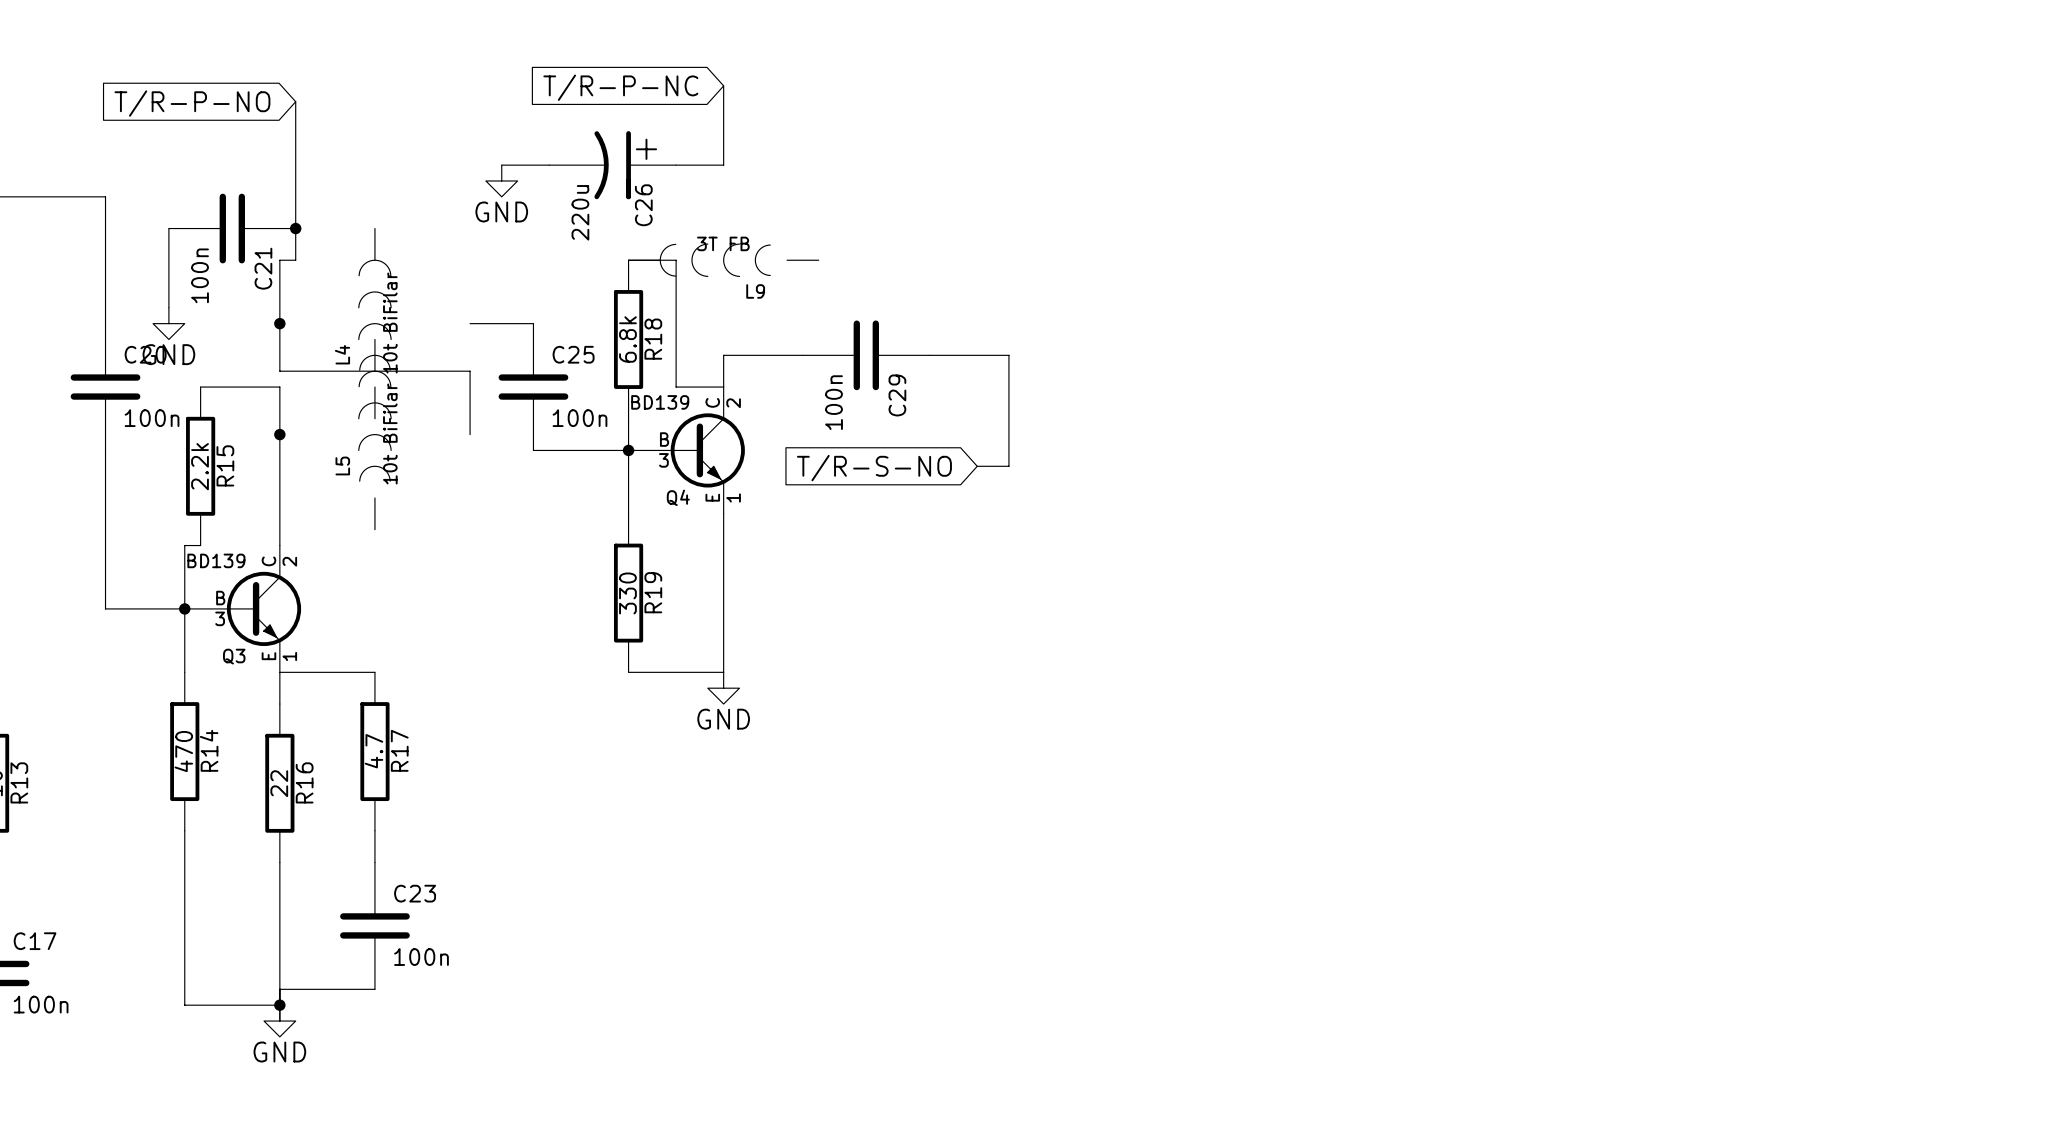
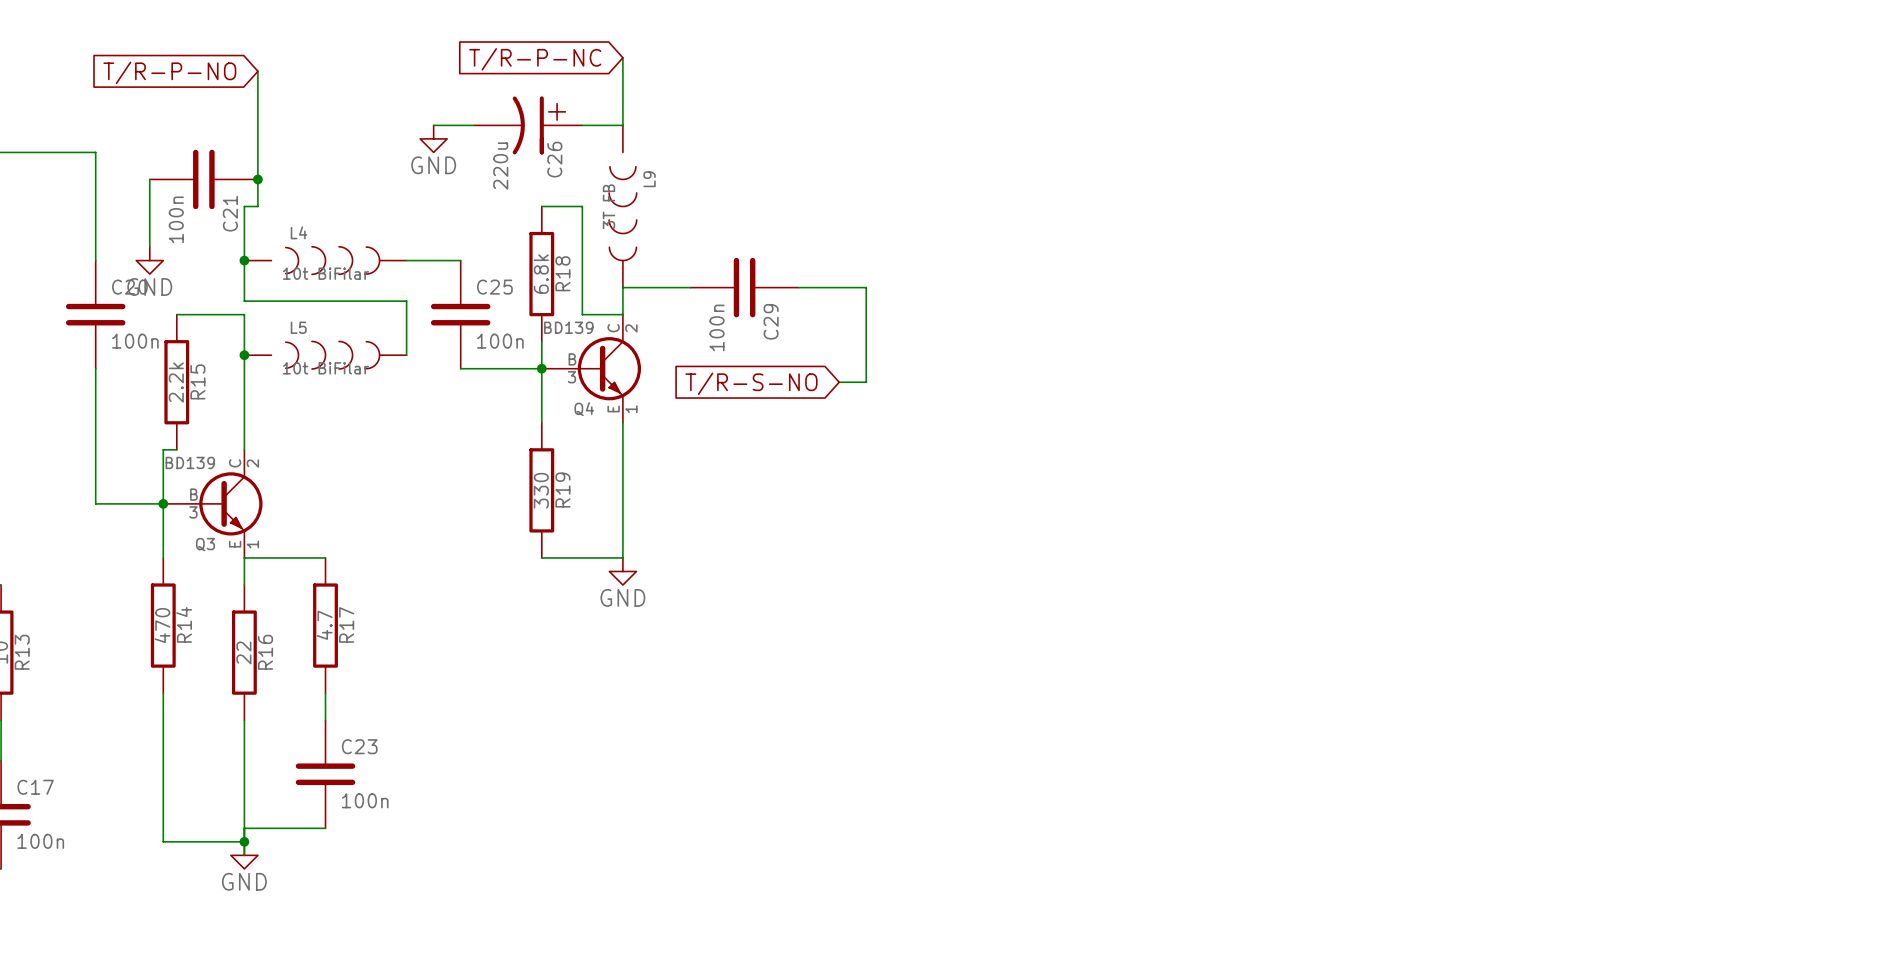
L9 rotation: 0° (715, 260) -> 90° counterclockwise (622, 213)
L4 rotation: 0° (374, 315) -> 90° clockwise (332, 260)
L5 rotation: 0° (374, 426) -> 90° clockwise (332, 355)

